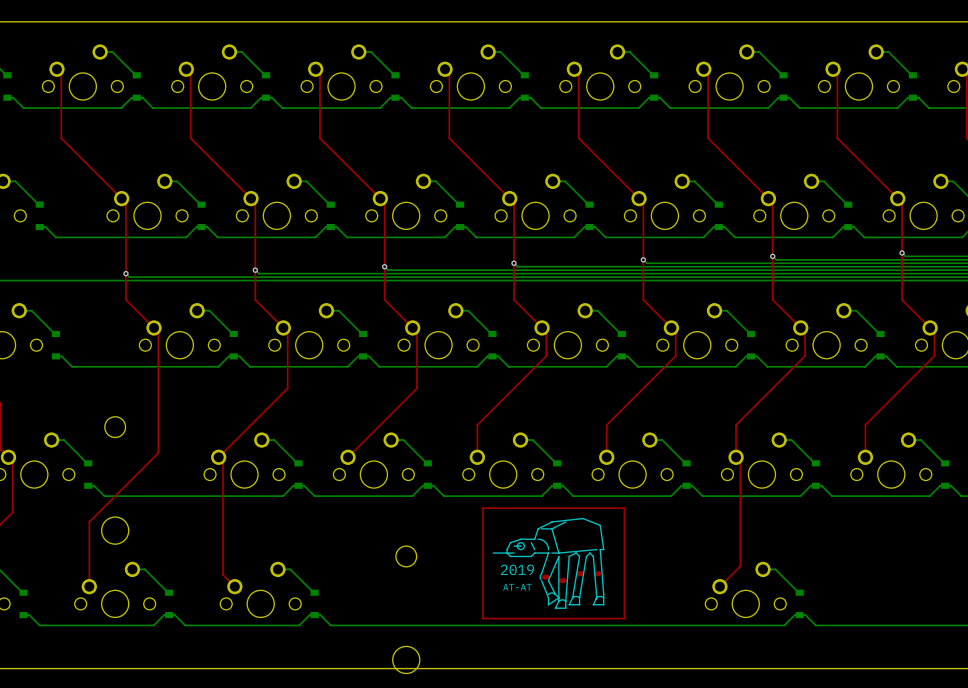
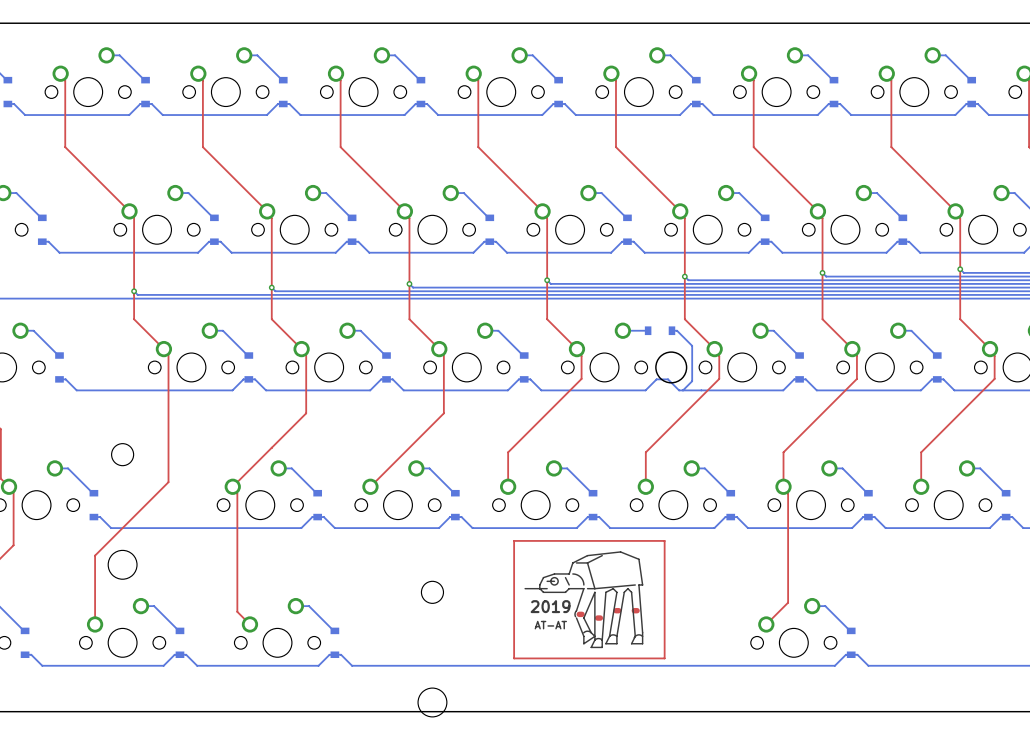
bottom track: (597, 310) (621, 333) -> (636, 330) (648, 330)
bottom track: none -> (671, 330) (677, 330) (692, 345) (692, 381) (683, 390)
round board edge: none -> [655, 351, 688, 384]
part rotation: 0° (621, 345) -> 90° clockwise (660, 330)
part position: (621, 345) -> (660, 330)

